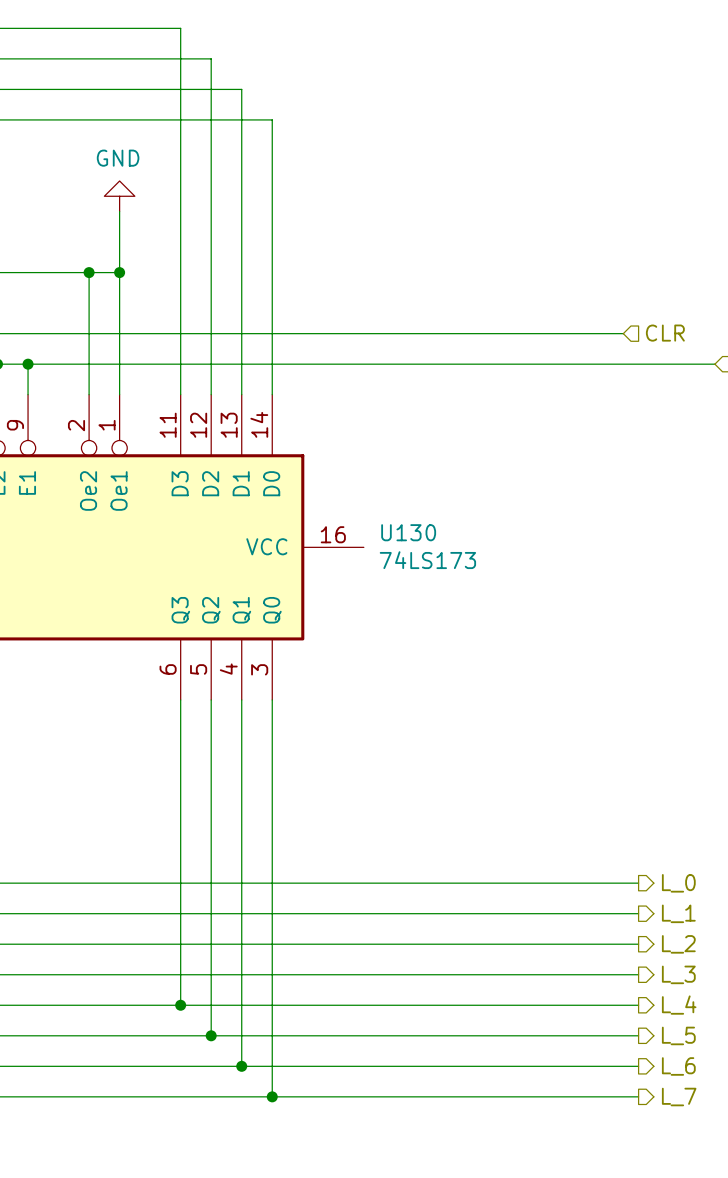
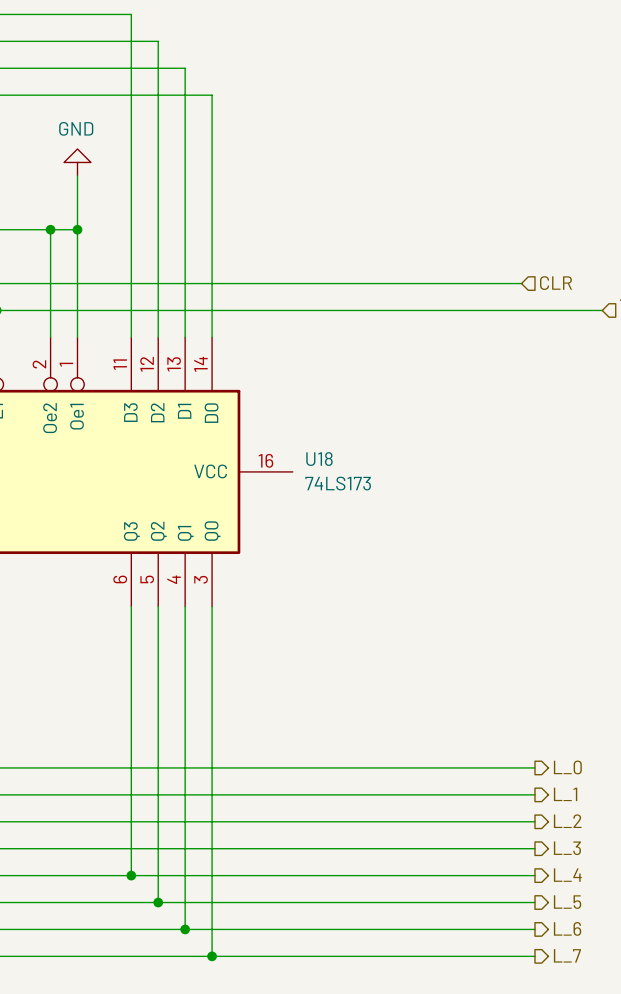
U130 name: U130 (408, 532) -> U18 (319, 459)

